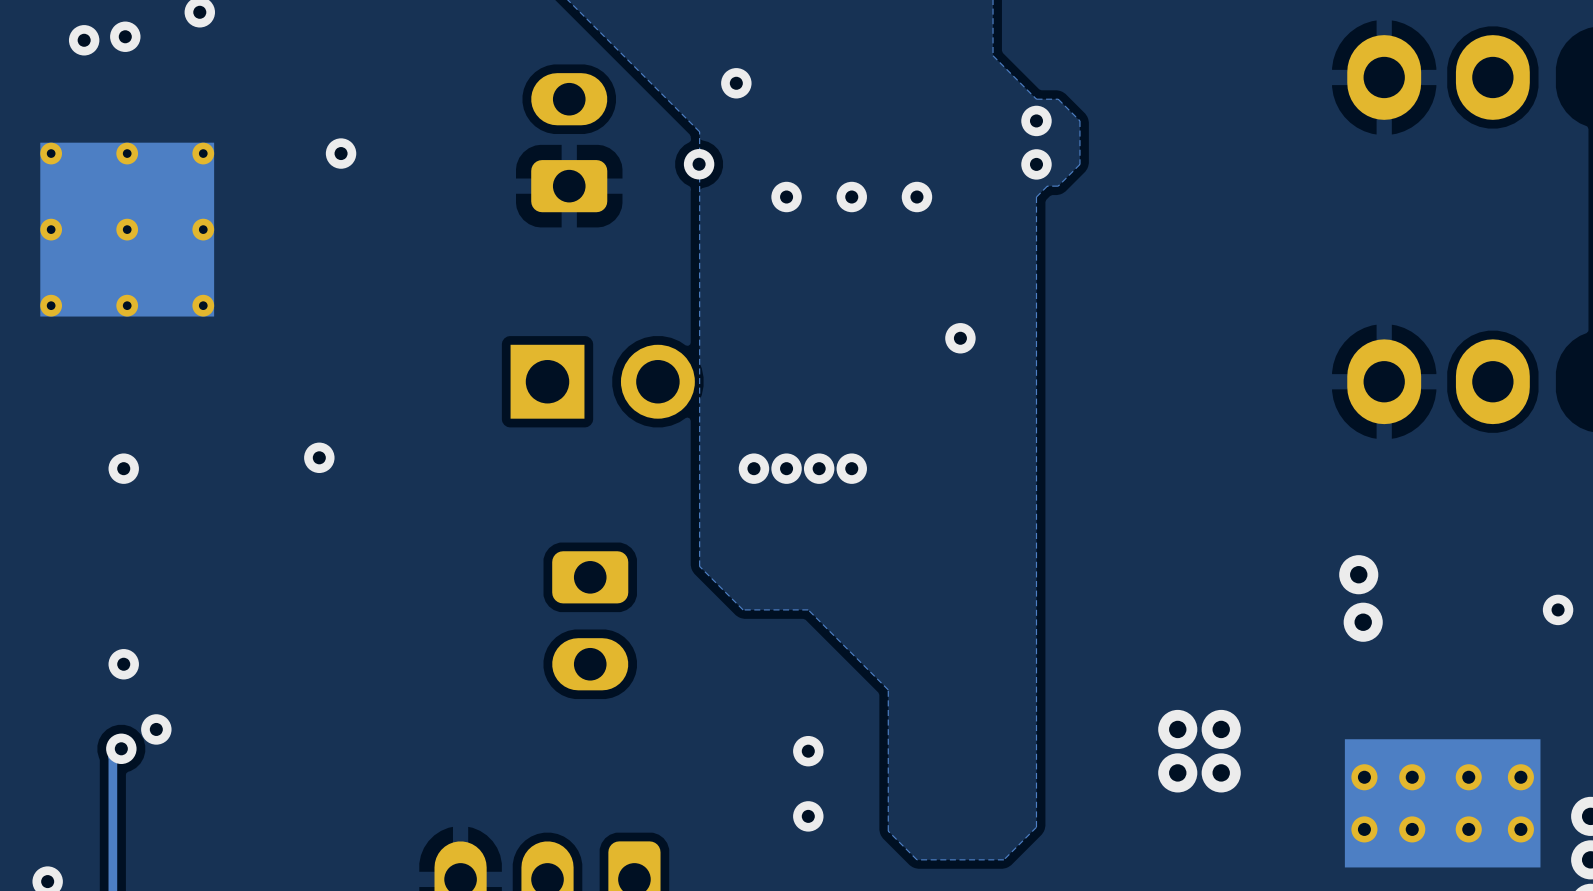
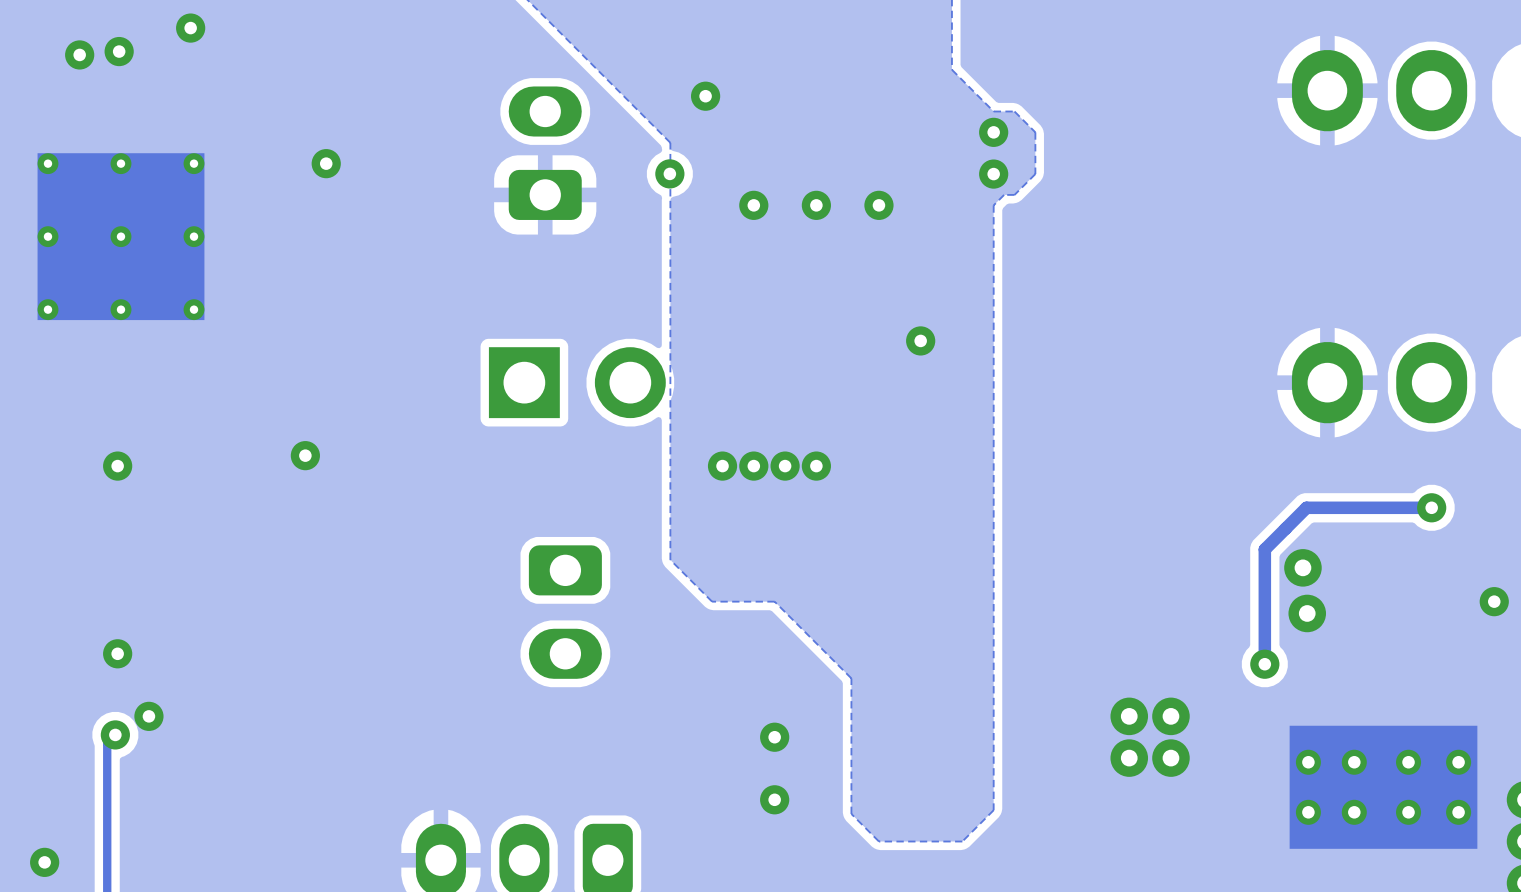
track: none -> (1431, 507) (1306, 507) (1264, 549) (1264, 664)
via: none -> (1431, 507)
via: none -> (1264, 664)

